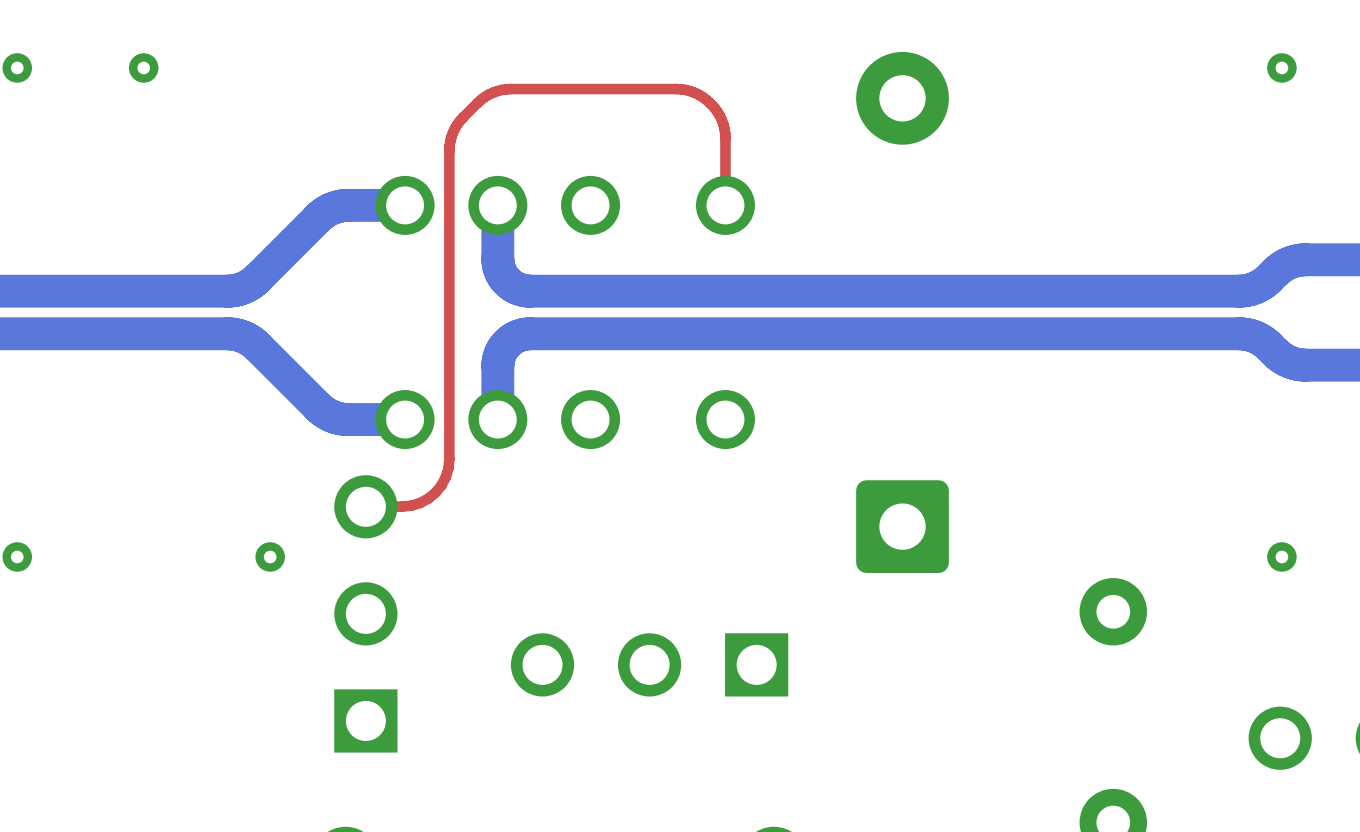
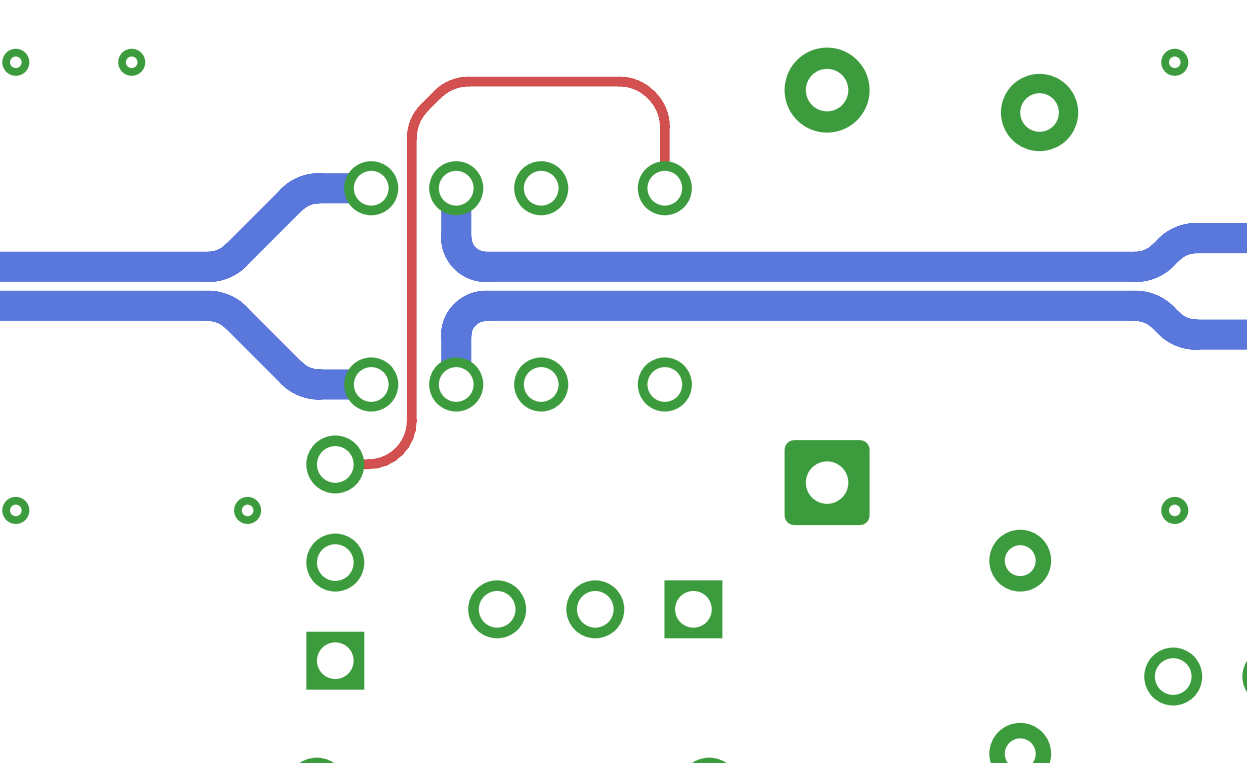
part: none -> (1039, 112)

